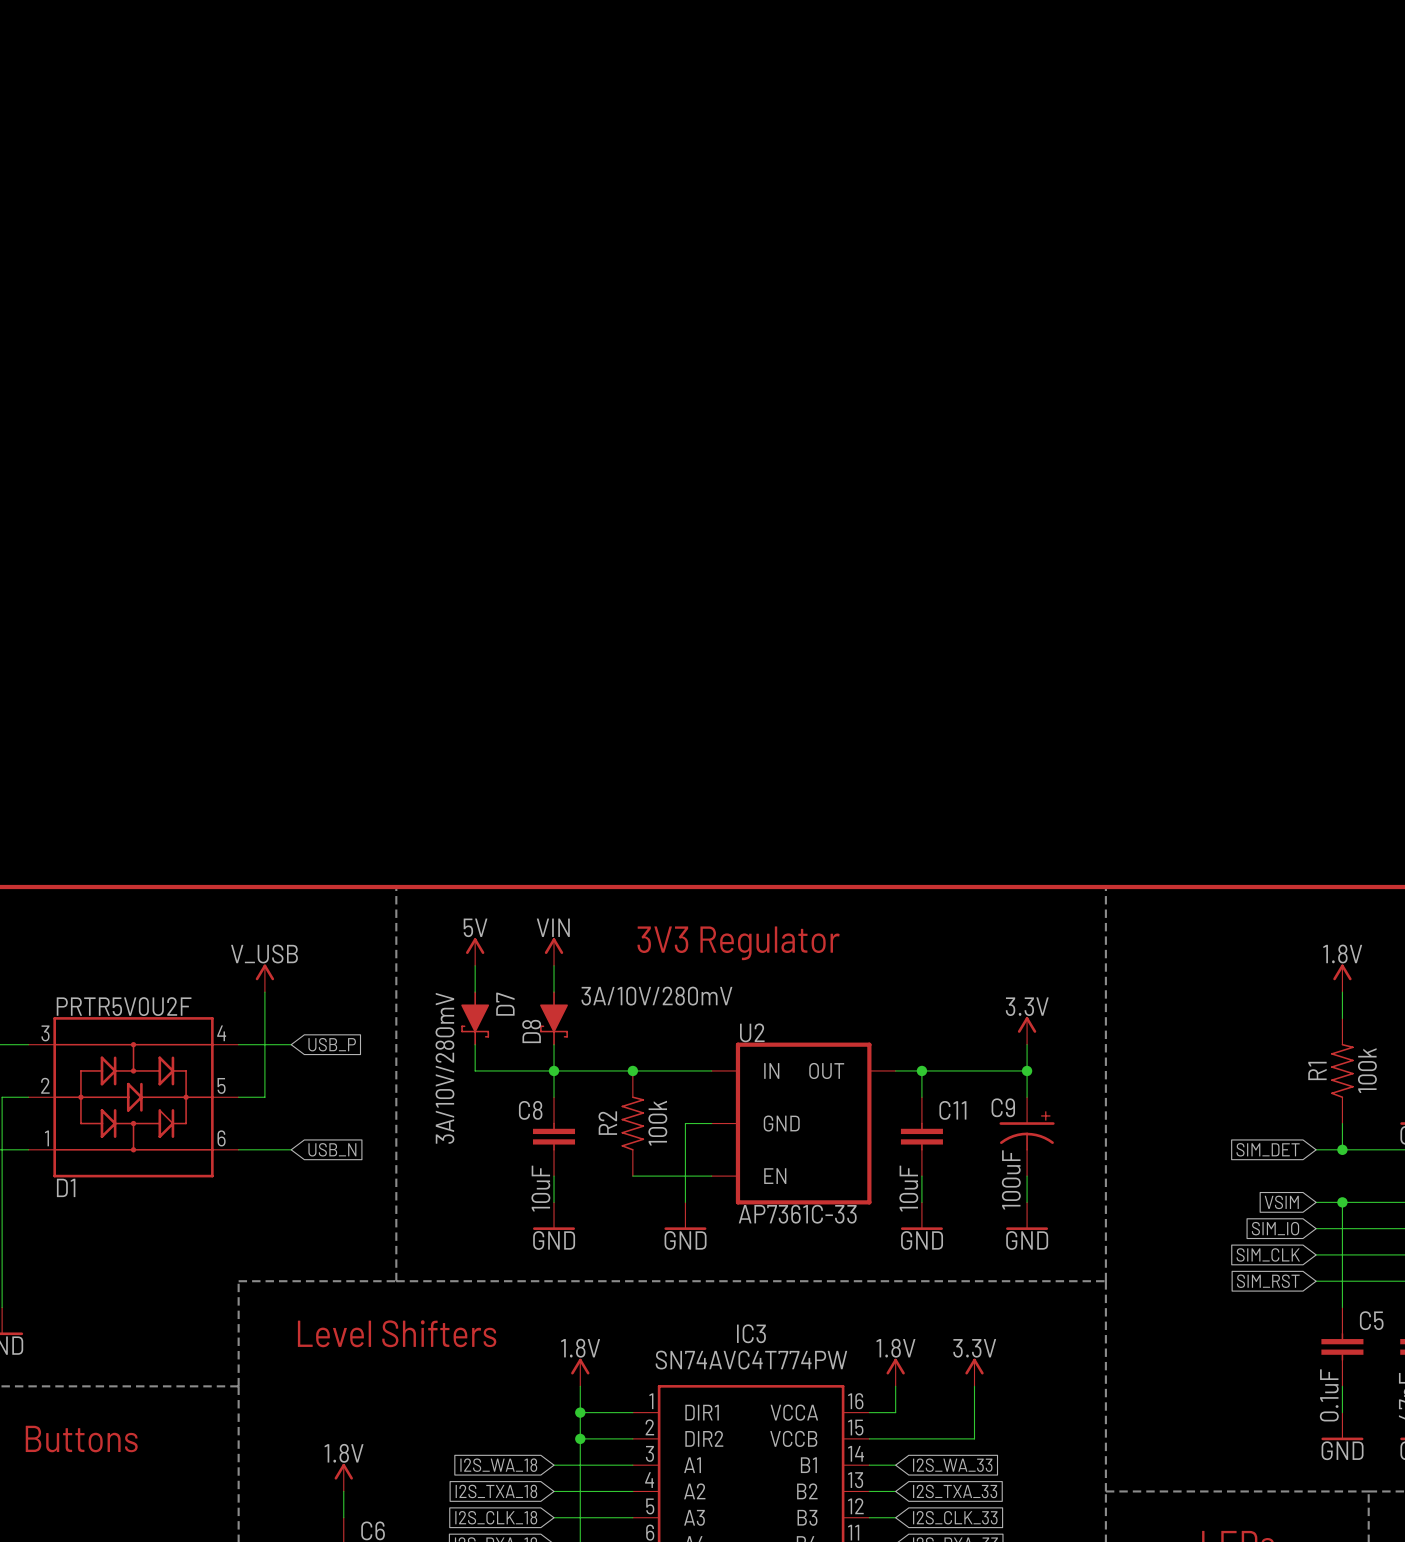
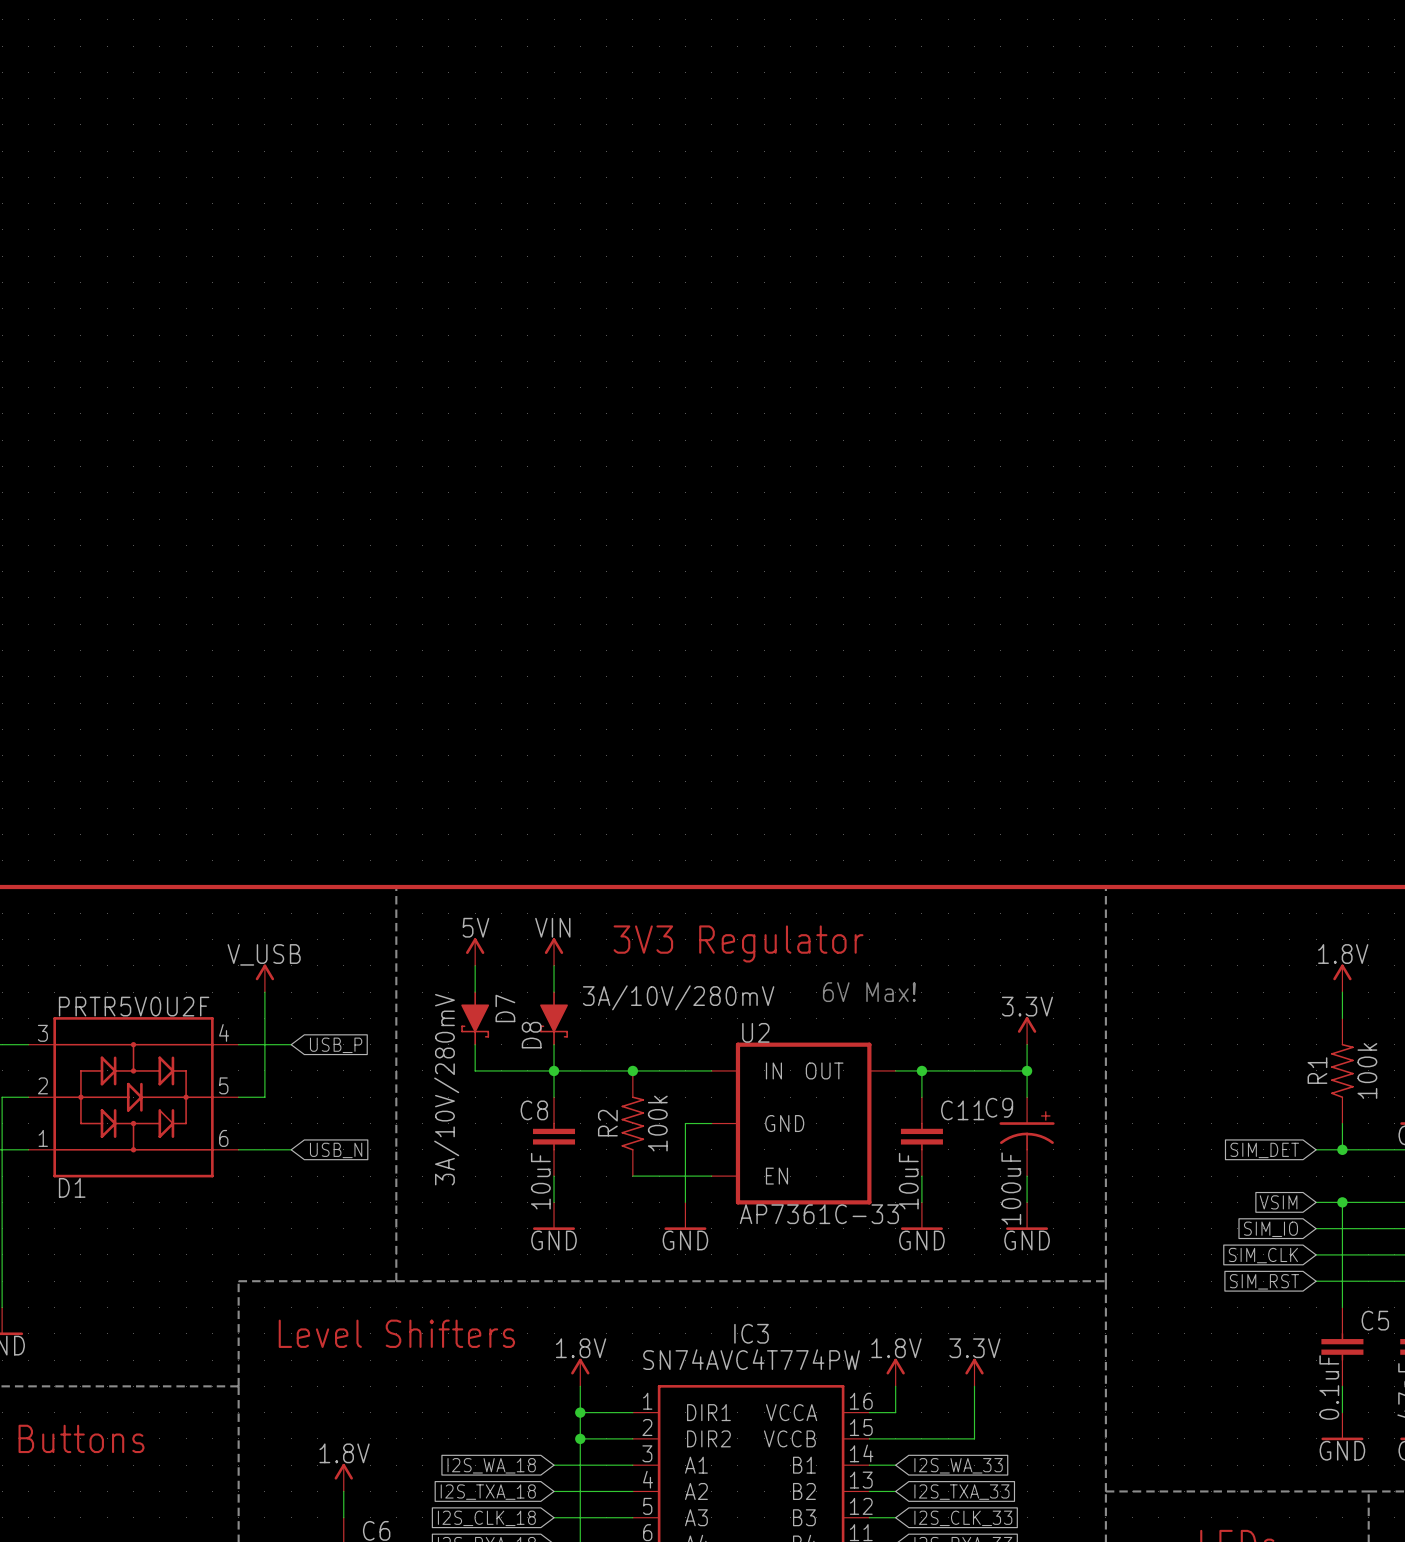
text: none -> 6V Max! (869, 992)

